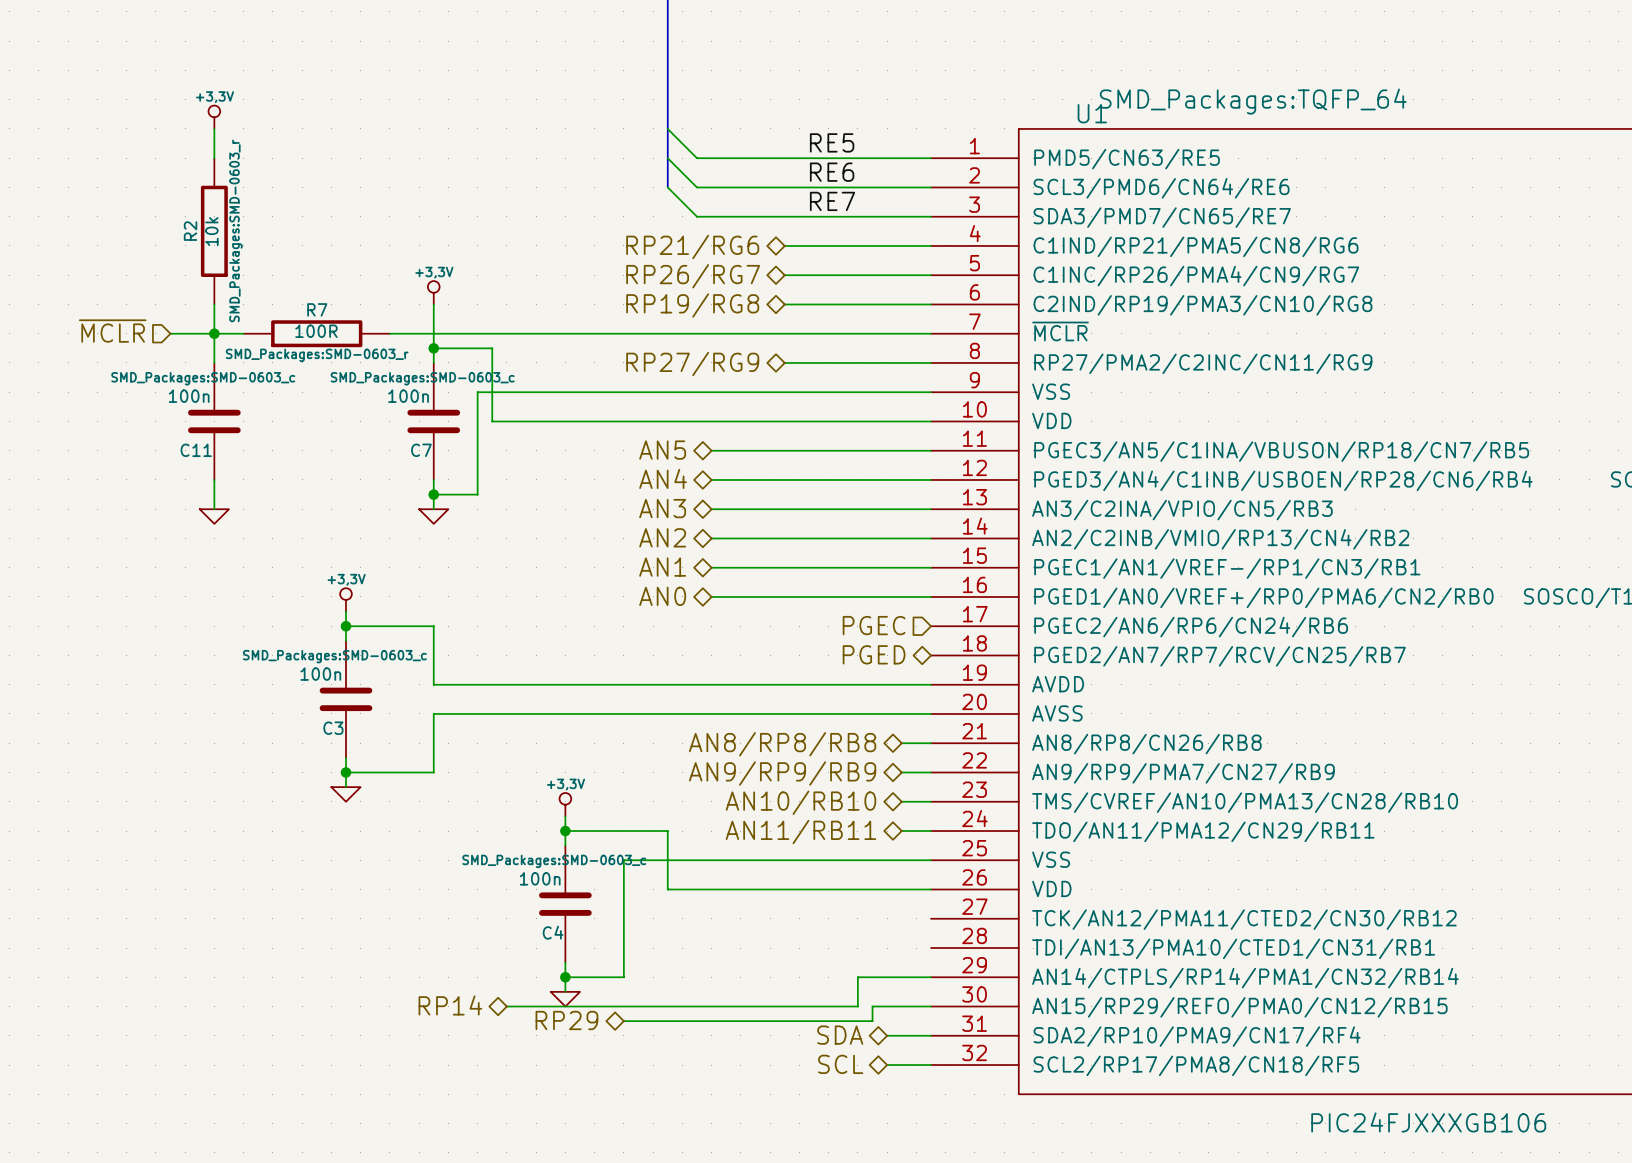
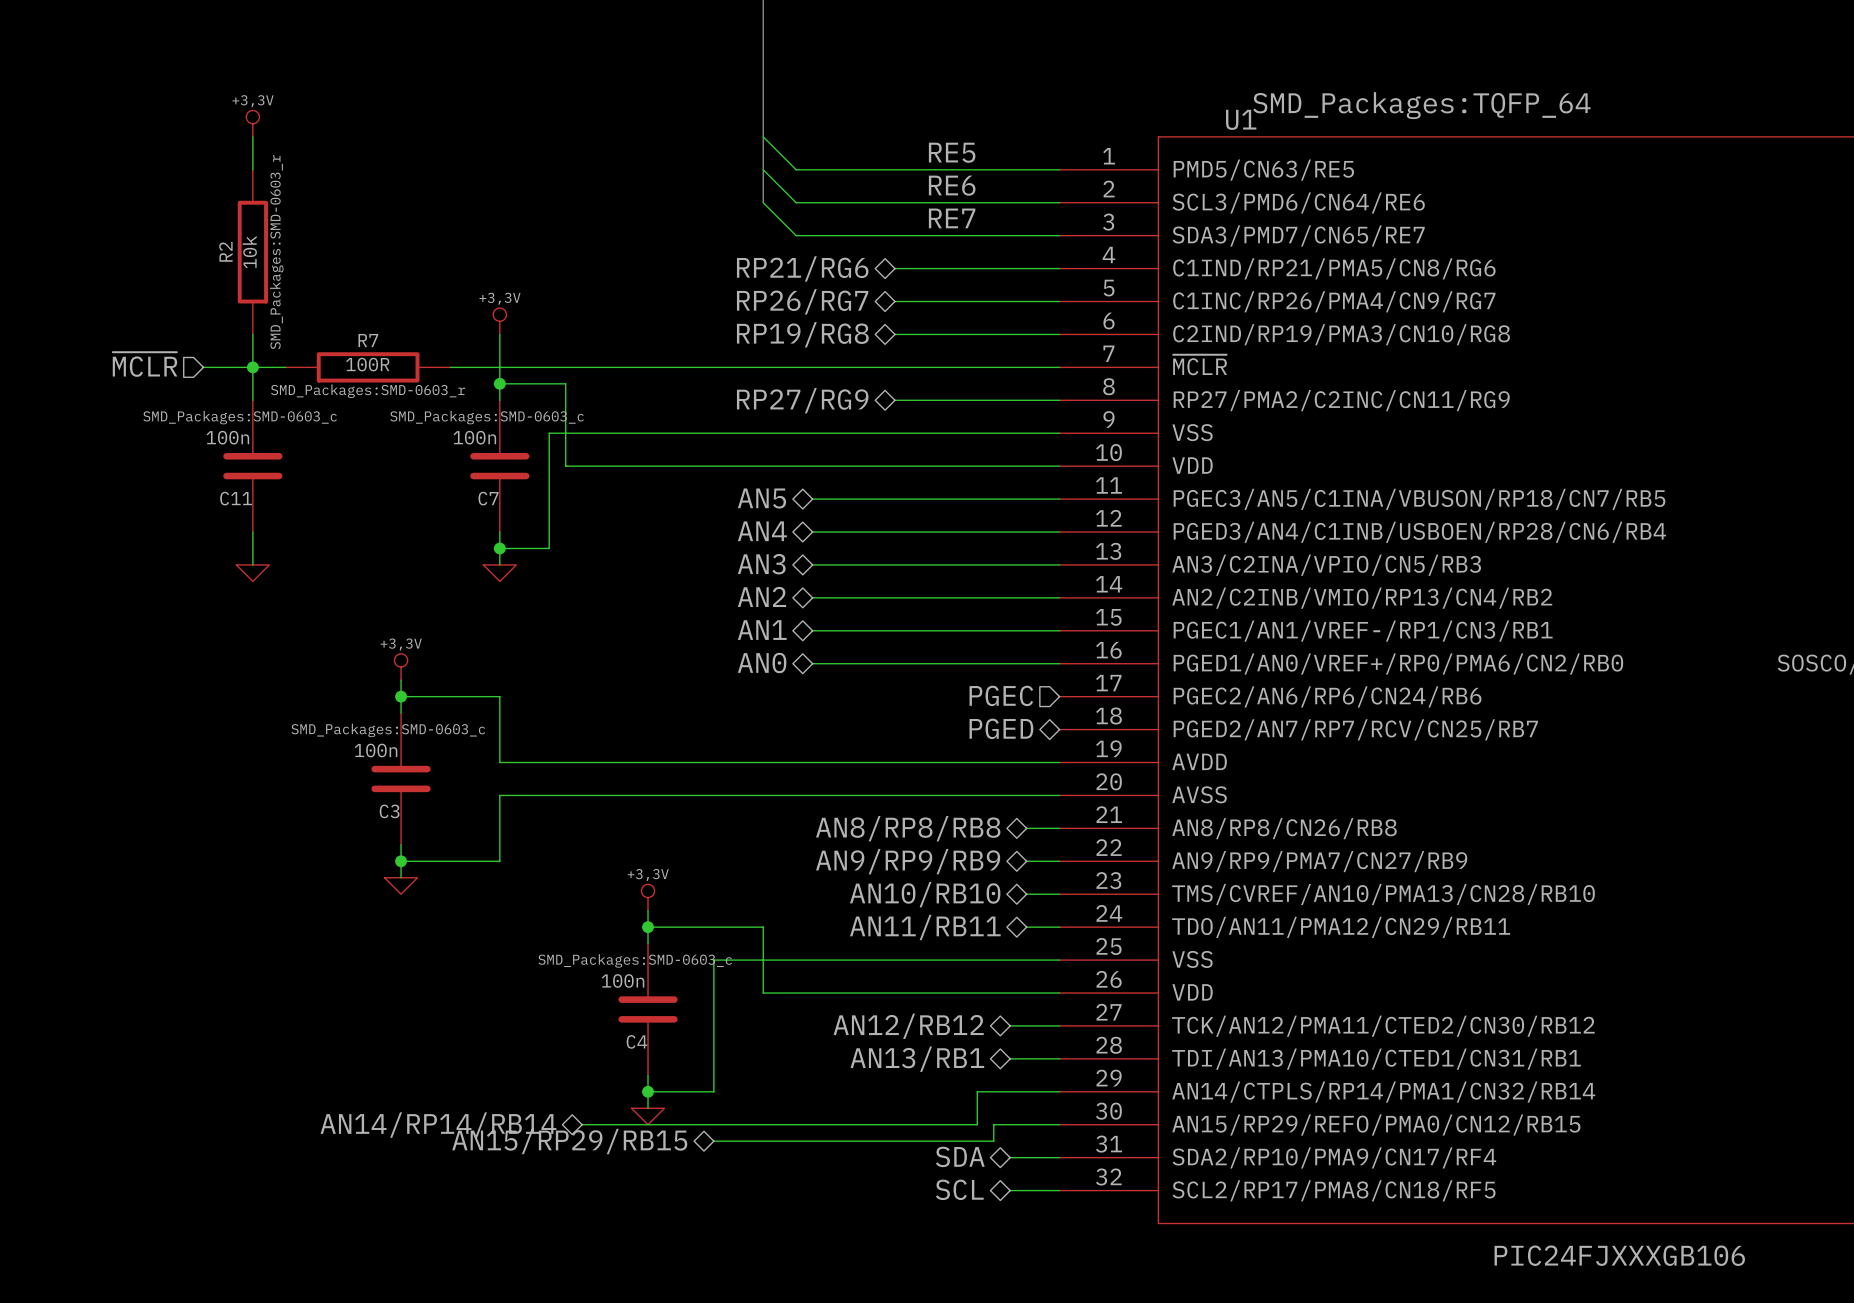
wire: none -> (1010, 1025) (1059, 1025)
hierarchical label: none -> AN12/RB12 (908, 1026)
wire: none -> (1010, 1058) (1059, 1058)
hierarchical label: none -> AN13/RB1 (917, 1059)
hierarchical label: RP14 (450, 1005) -> AN14/RP14/RB14 (438, 1125)
hierarchical label: RP29 (566, 1020) -> AN15/RP29/RB15 (569, 1141)

